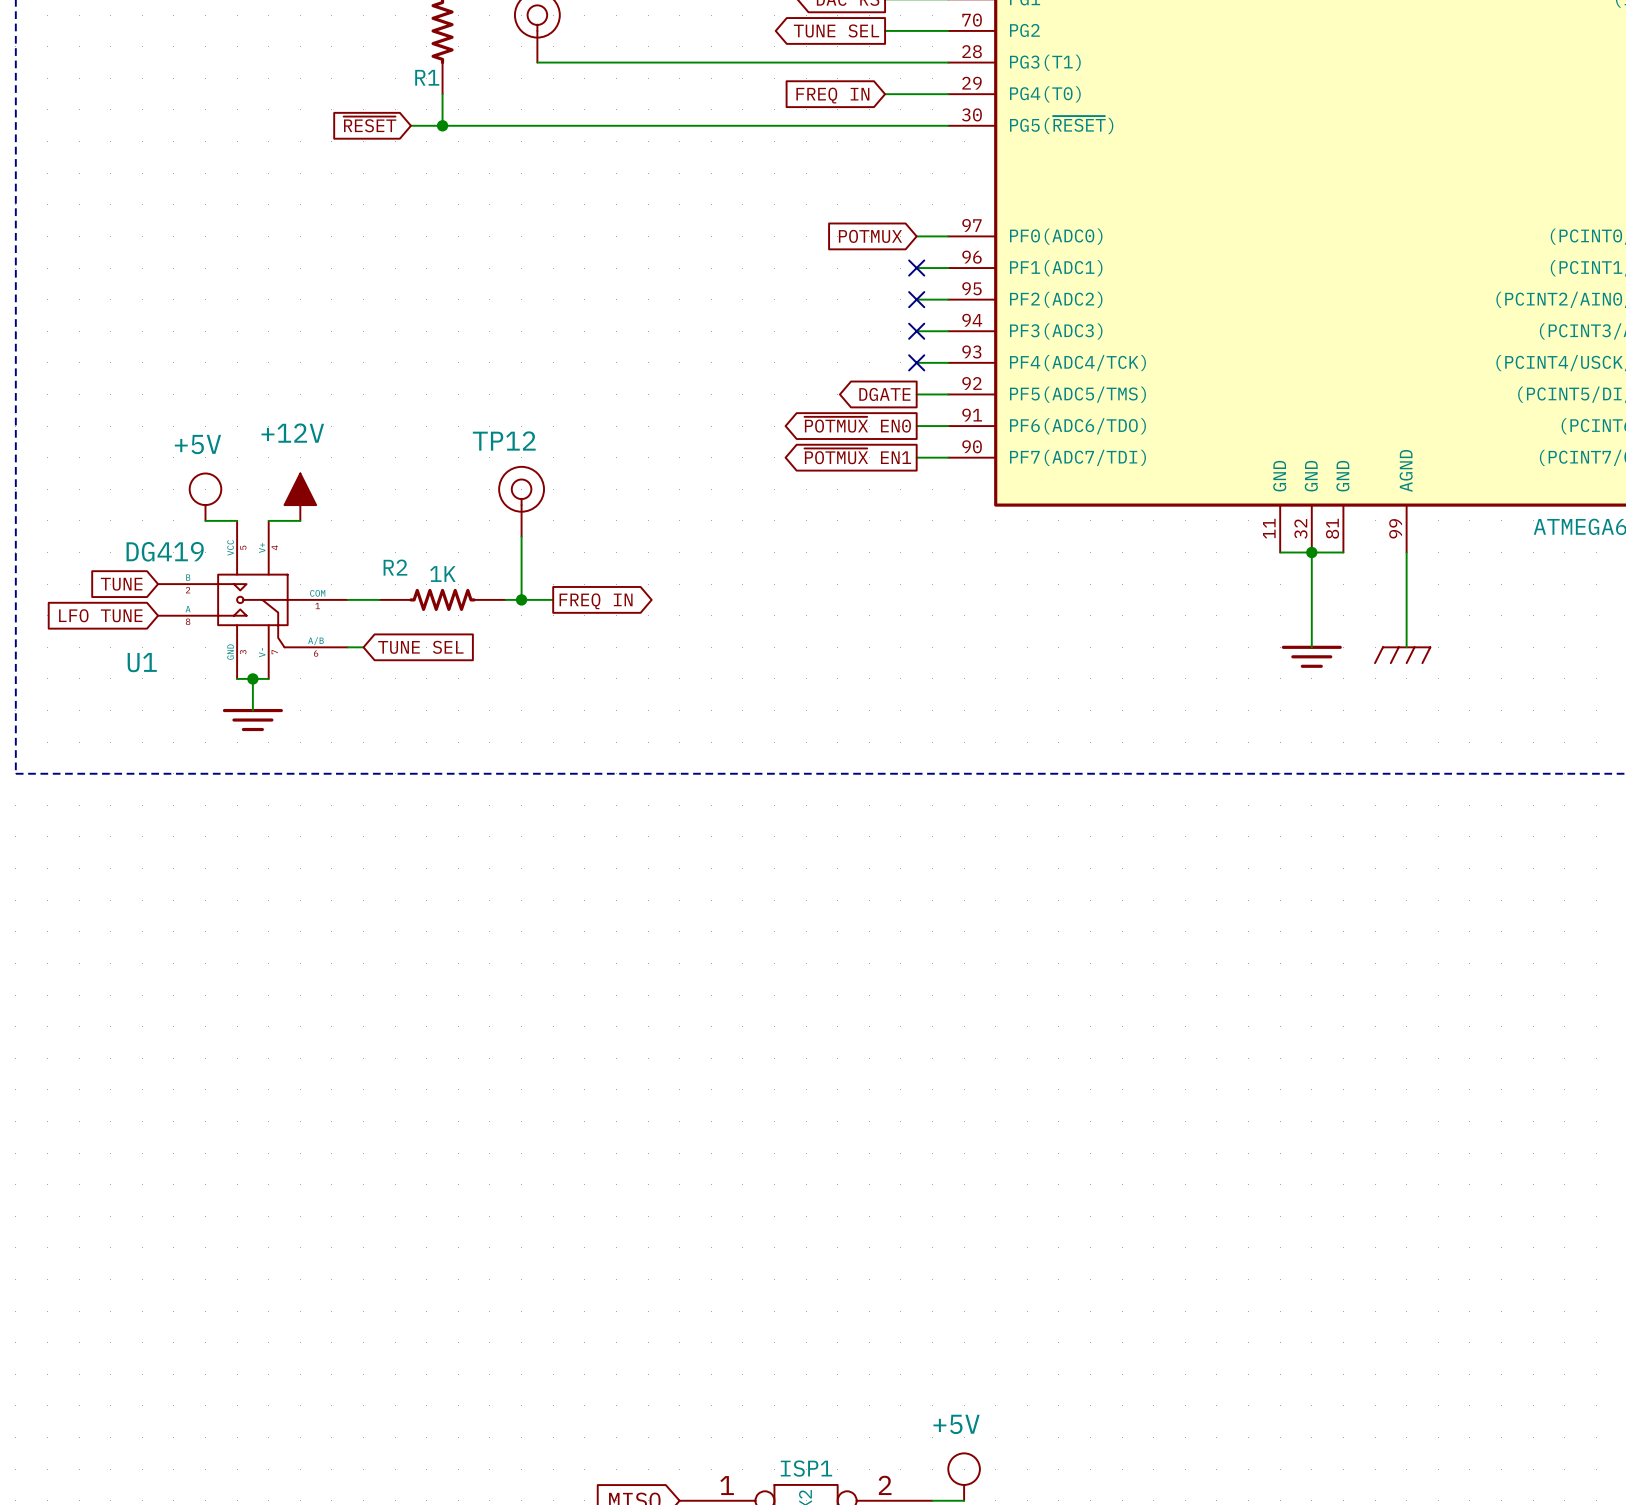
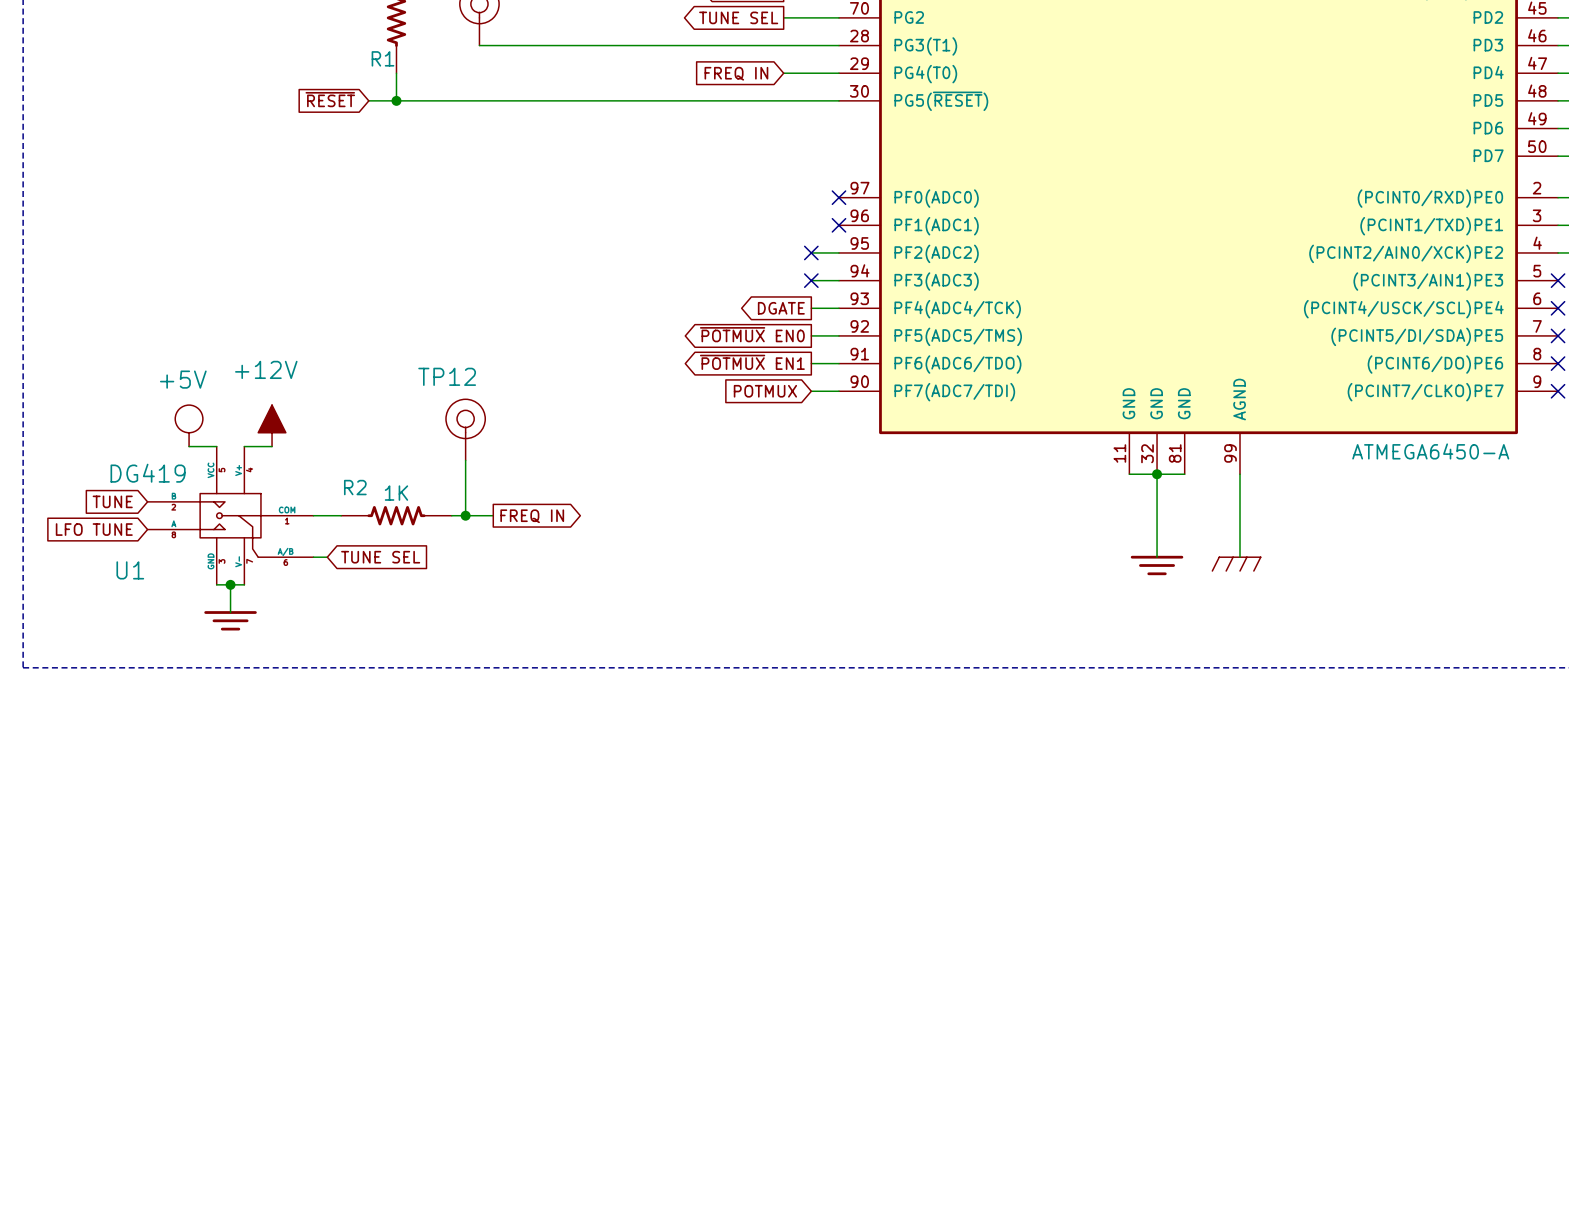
global label: POTMUX (870, 236) -> none
wire: (916, 236) (948, 236) -> none
no-connect mark: none -> (838, 197)
wire: (916, 268) (948, 268) -> none
no-connect mark: (916, 268) -> none
no-connect mark: none -> (838, 225)
global label: none -> DGATE (781, 308)
no-connect mark: (916, 362) -> none
global label: DGATE (884, 394) -> ~{POTMUX} EN0 (752, 334)
global label: ~{POTMUX} EN0 (857, 424) -> ~{POTMUX} EN1 (752, 362)
global label shape: output (857, 456) -> input (765, 391)
global label: ~{POTMUX} EN1 (857, 456) -> POTMUX (765, 391)

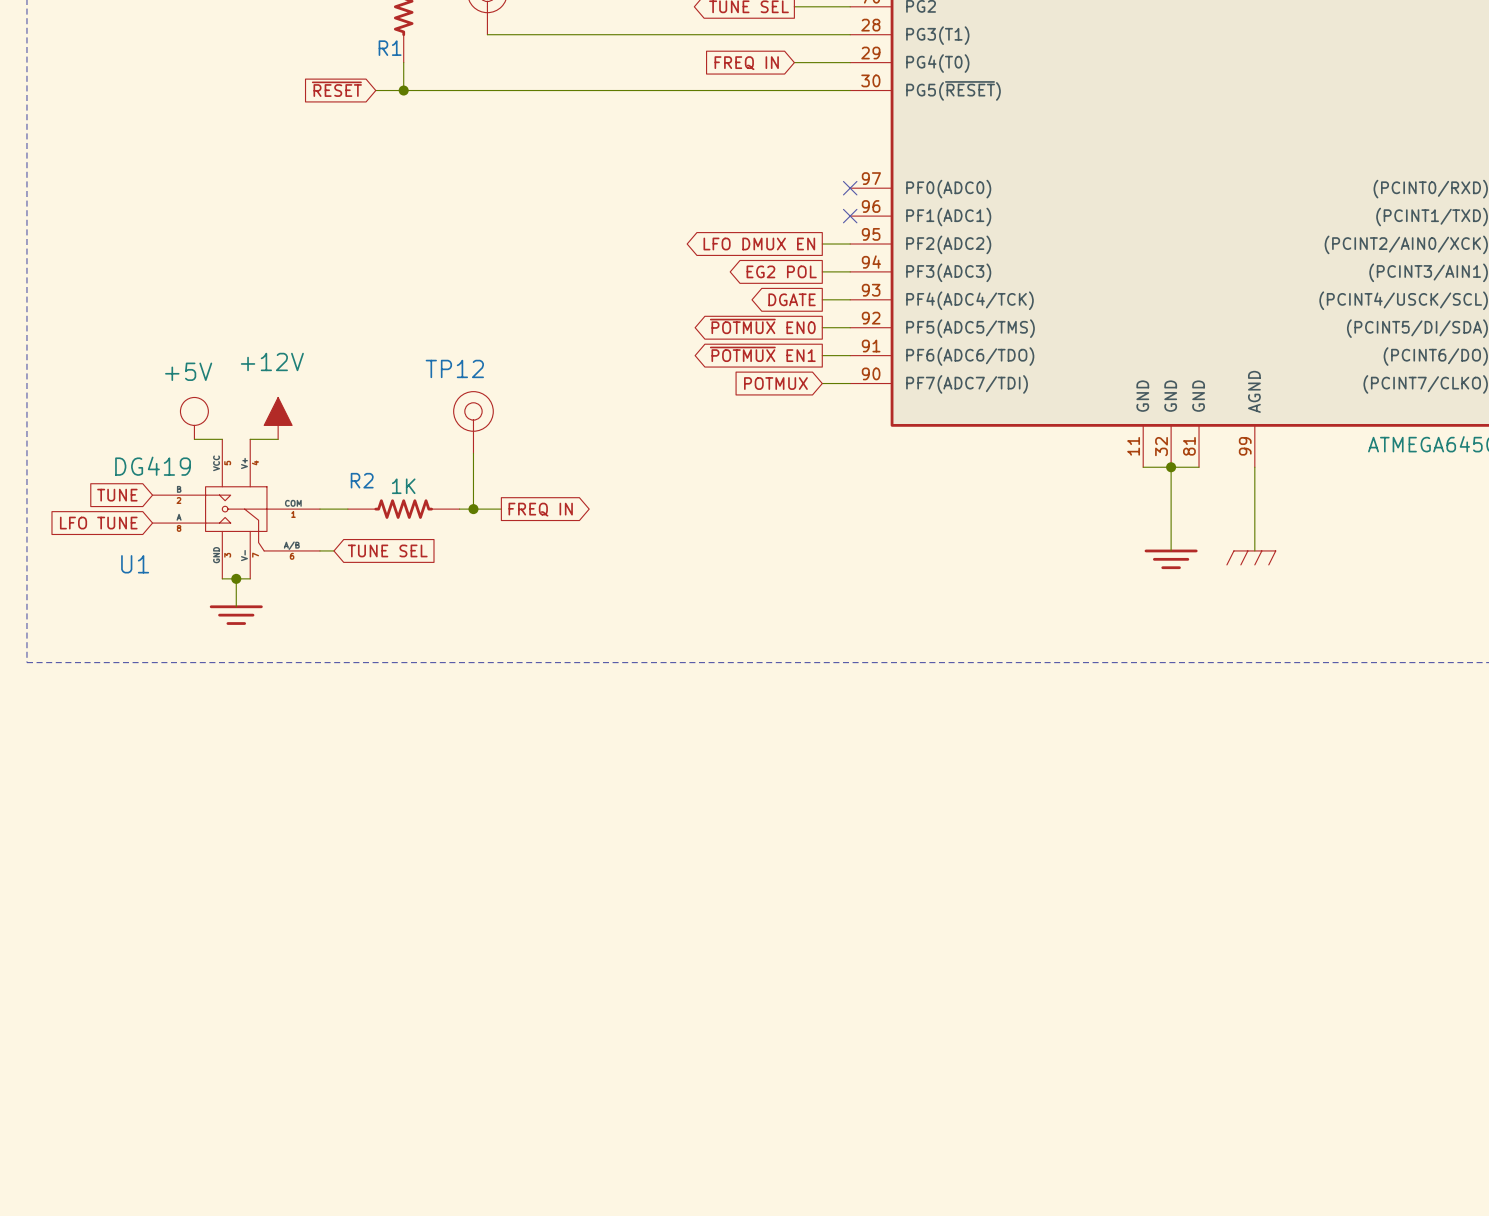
global label: none -> LFO DMUX EN (759, 244)
no-connect mark: (811, 252) -> none
global label: none -> EG2 POL (781, 271)
no-connect mark: (811, 280) -> none

